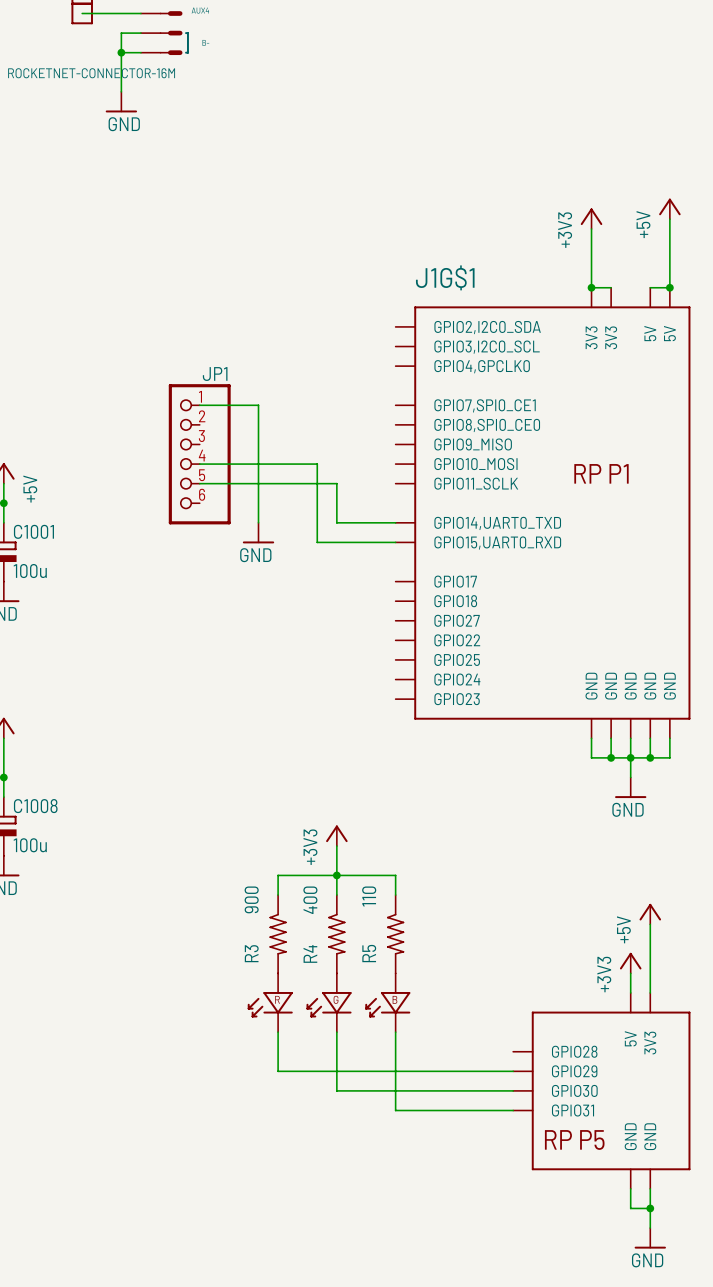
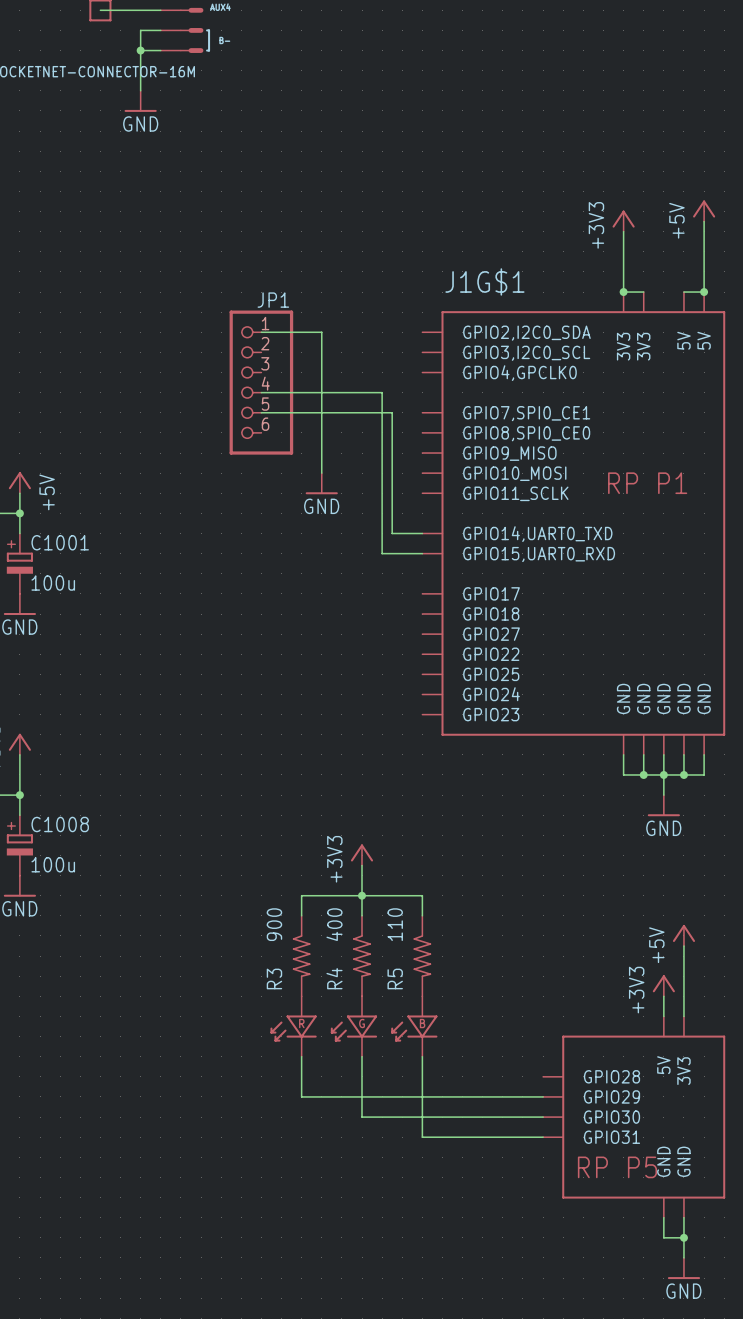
wire: none -> (261, 332) (321, 332) (321, 473)
wire: (199, 405) (238, 405) -> none
wire: (258, 405) (258, 522) -> none
JP1 position: (199, 454) -> (261, 382)
wire: (199, 464) (317, 464) (317, 542) (356, 542) -> (261, 392) (382, 392) (382, 553)
wire: (199, 483) (336, 483) (336, 522) (366, 522) -> (281, 412) (392, 412) (392, 533)
power symbol position: GND (258, 533) -> GND (321, 483)

